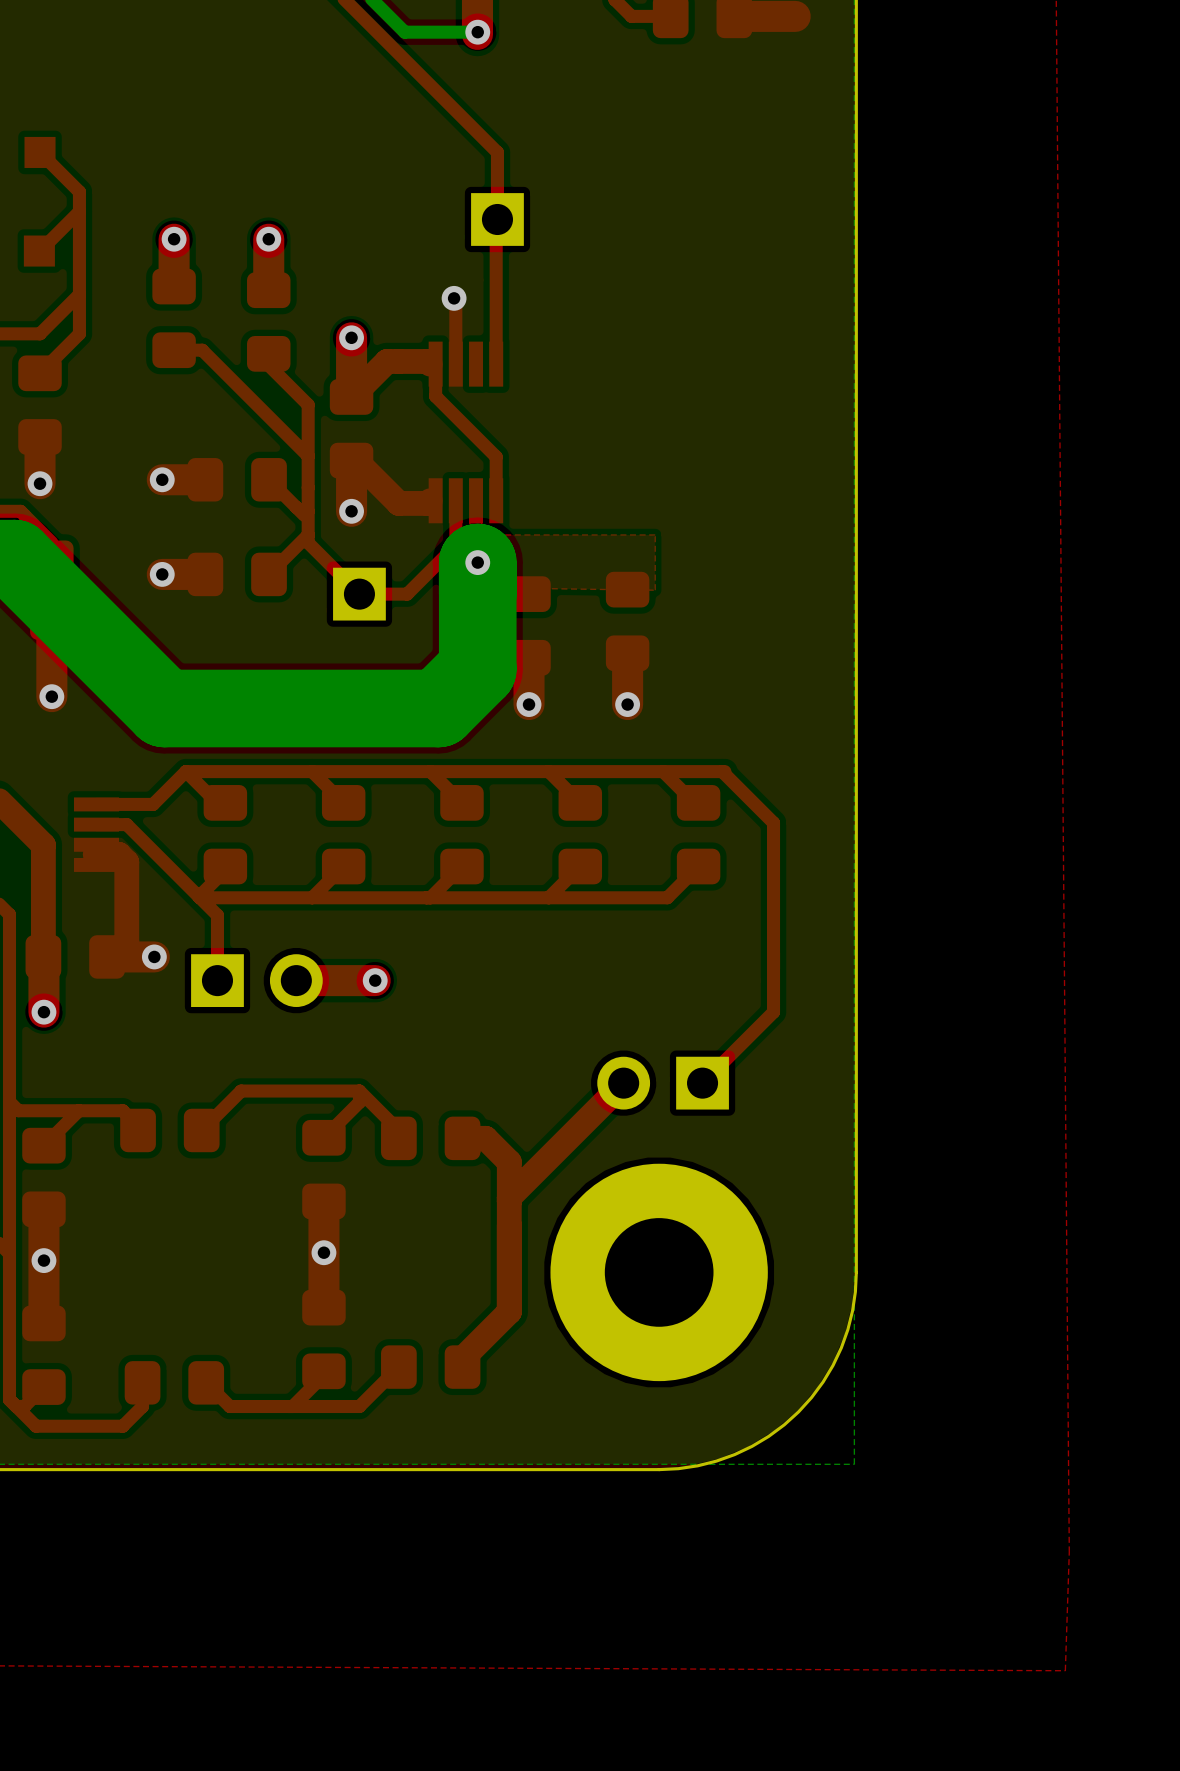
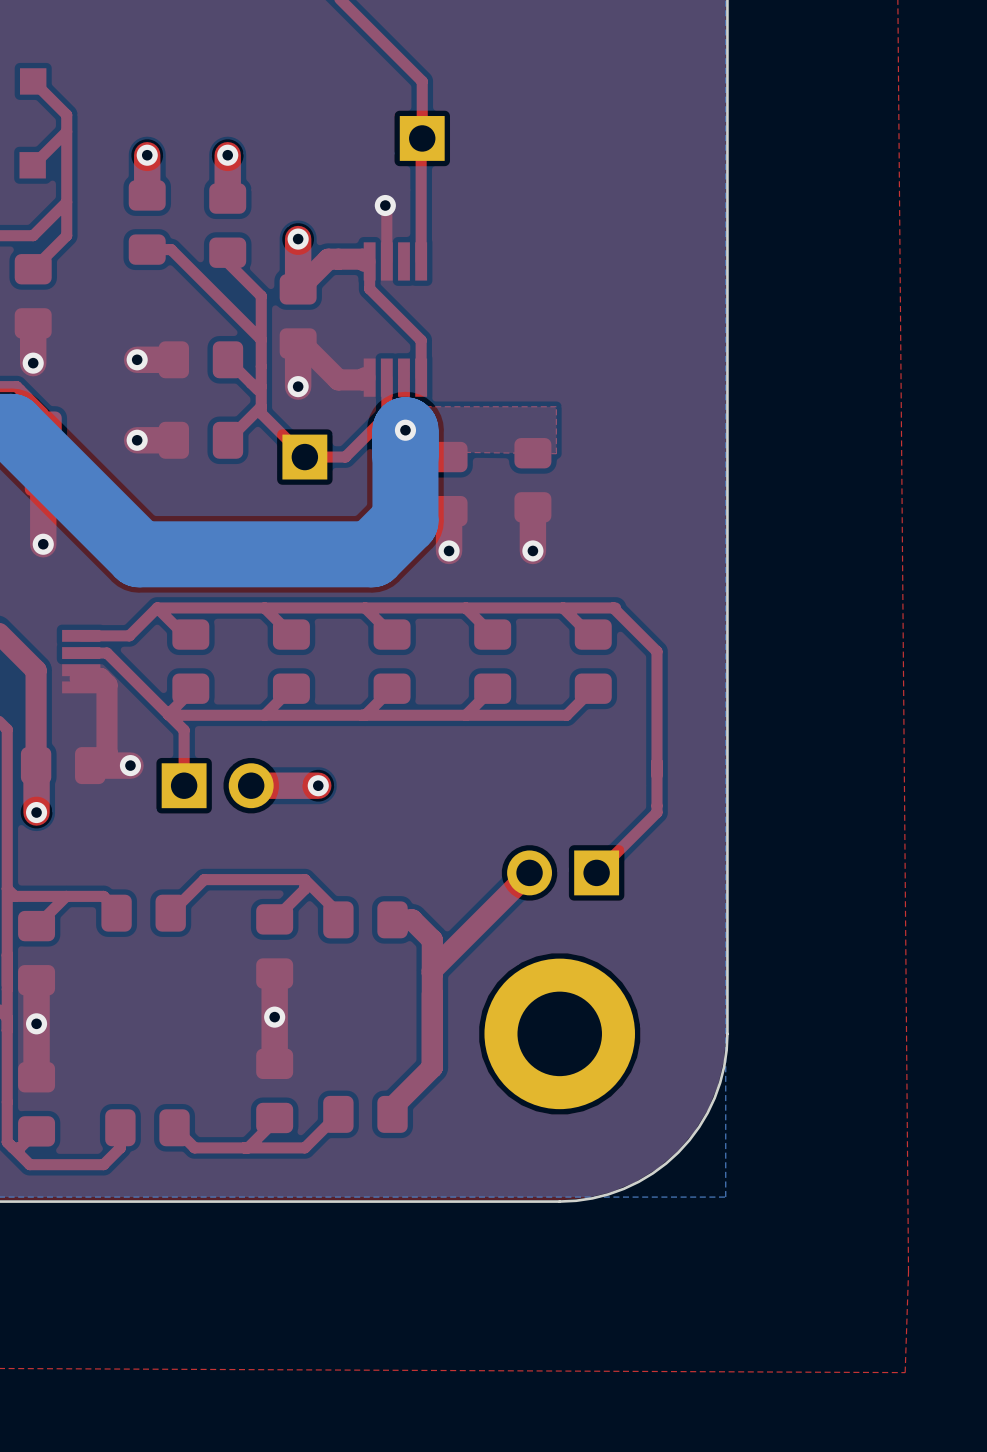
part footprint: [550, 1163, 768, 1382] -> [484, 958, 636, 1110]

